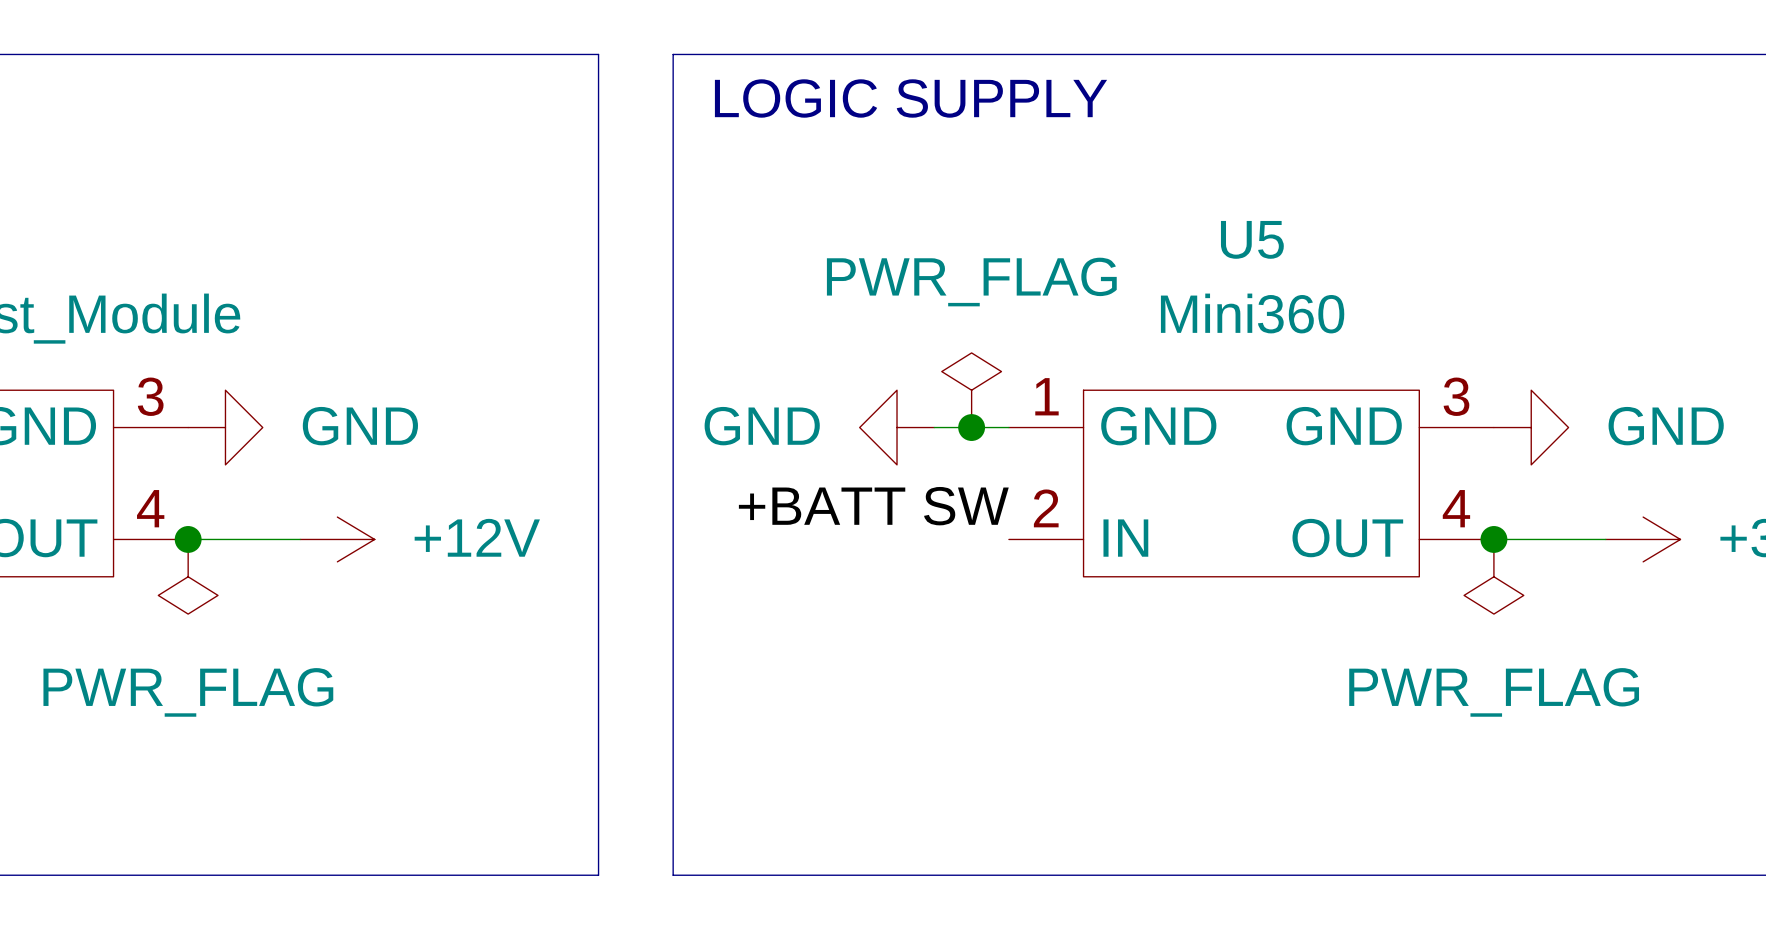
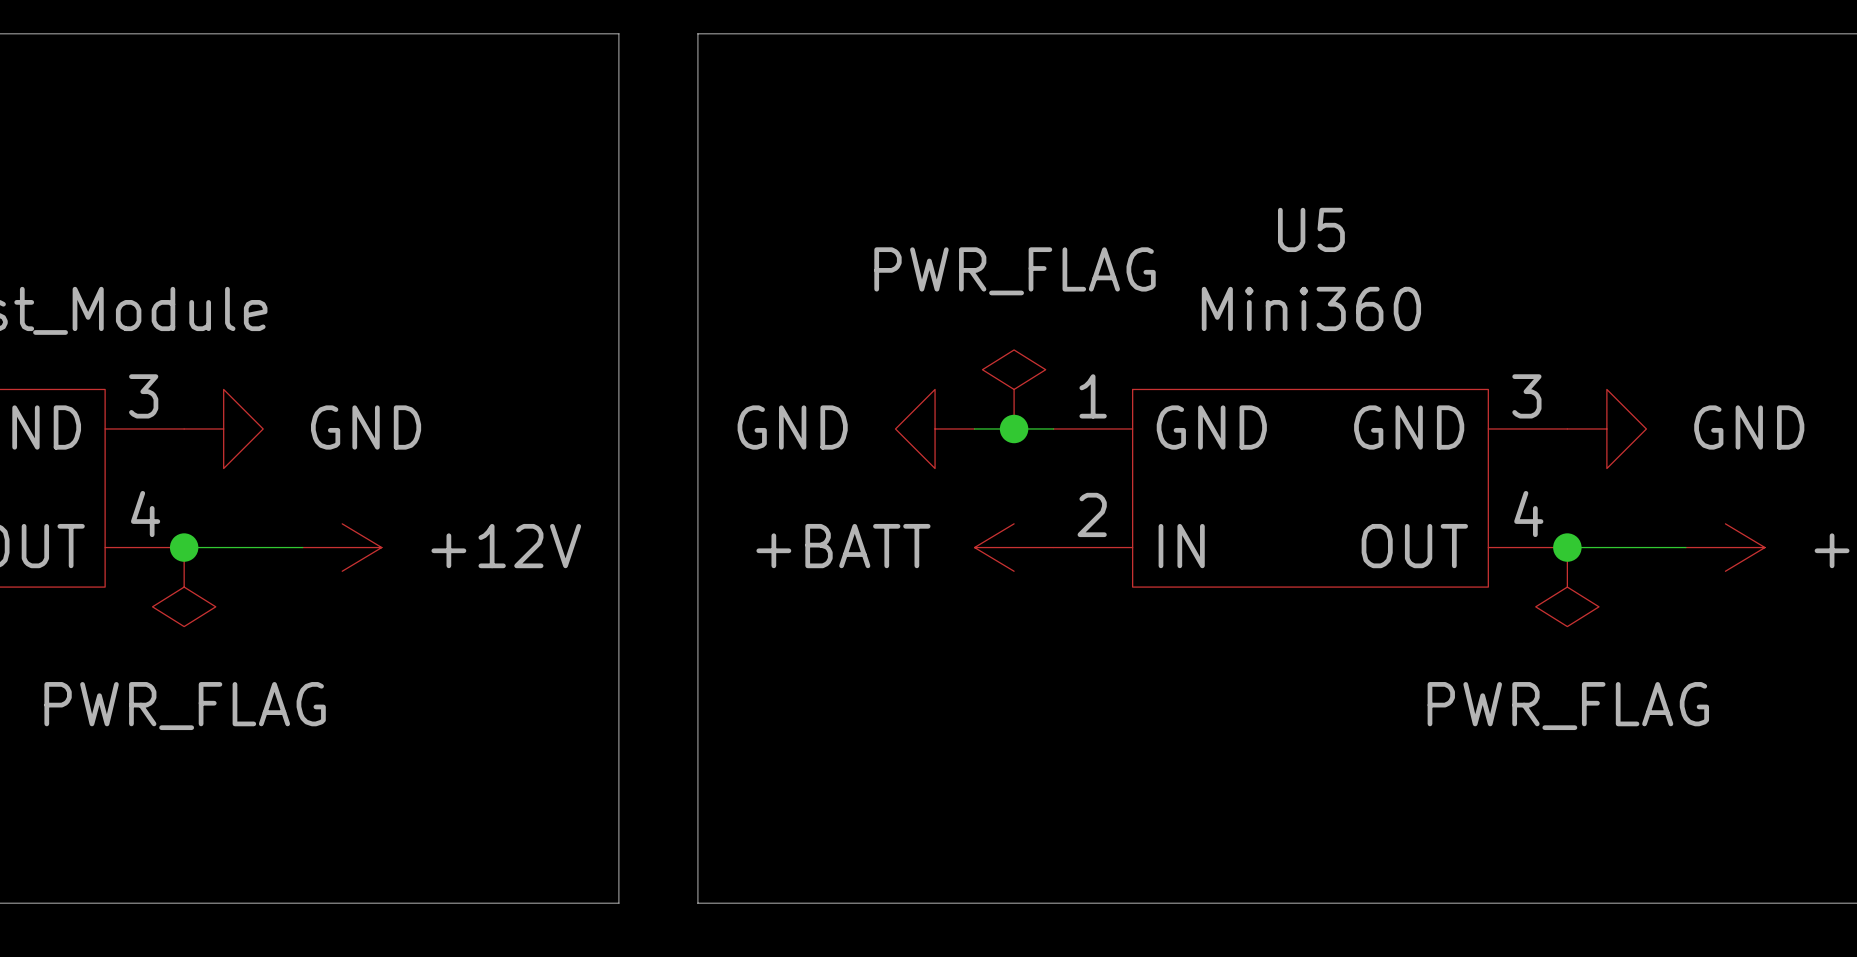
text: LOGIC SUPPLY (911, 98) -> none
label: +BATT SW (873, 506) -> none
power symbol: none -> +BATT (1014, 547)

